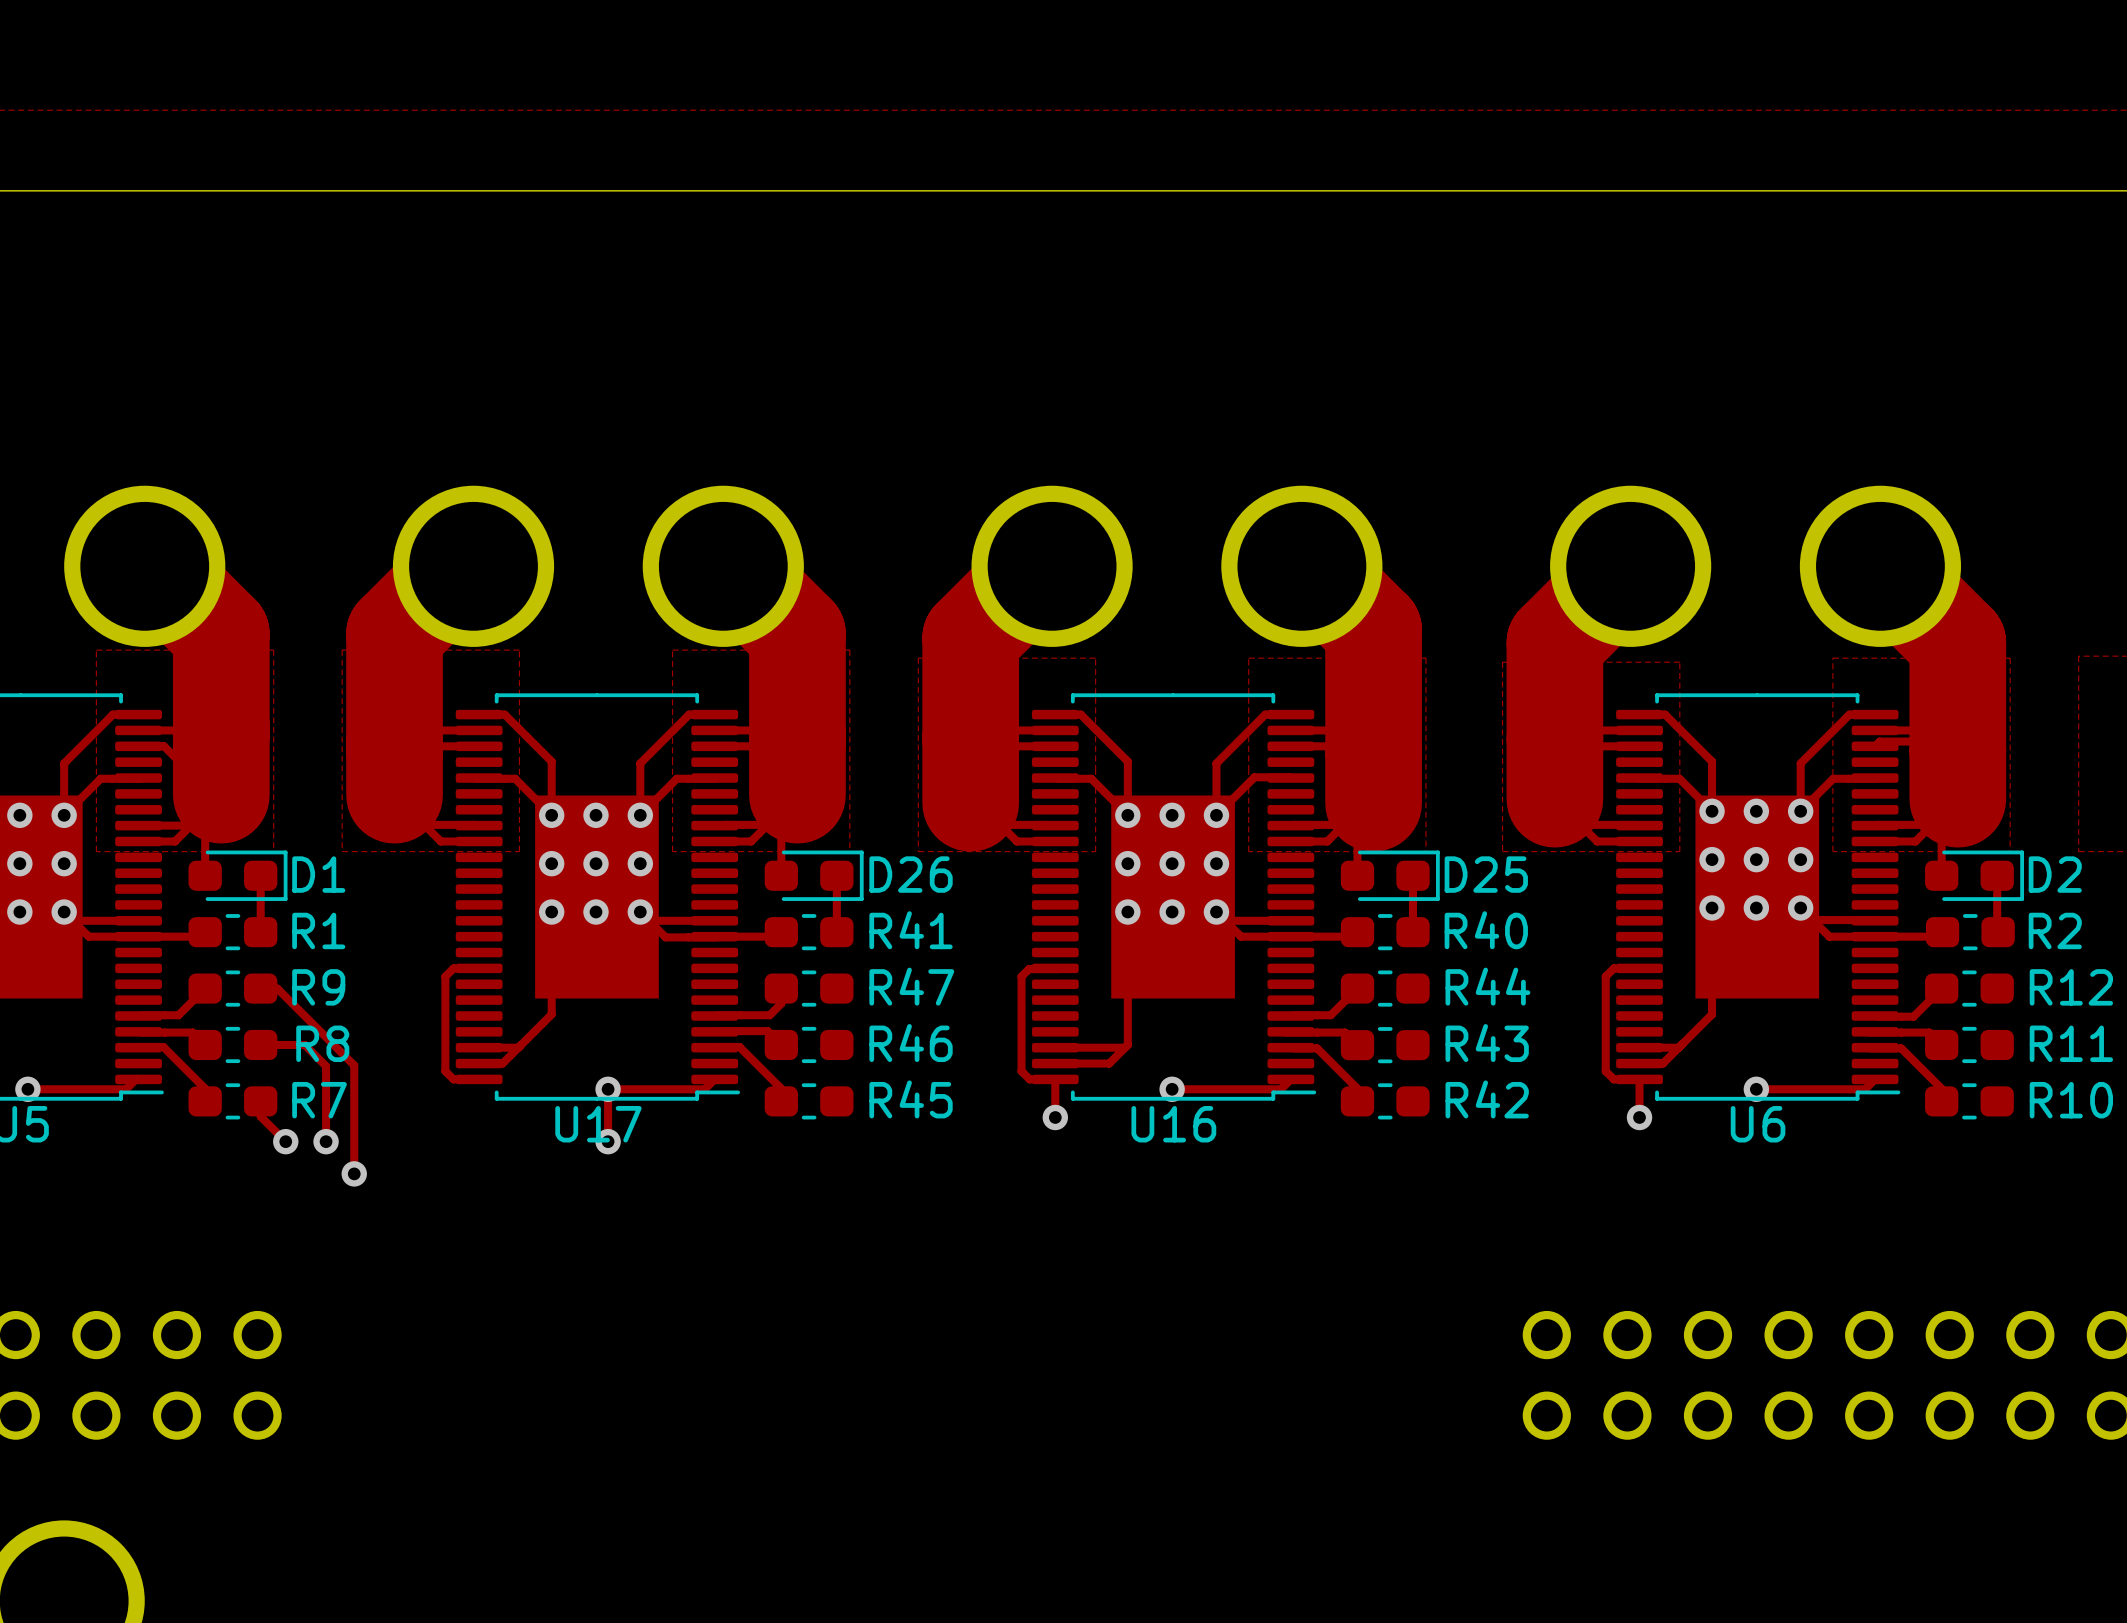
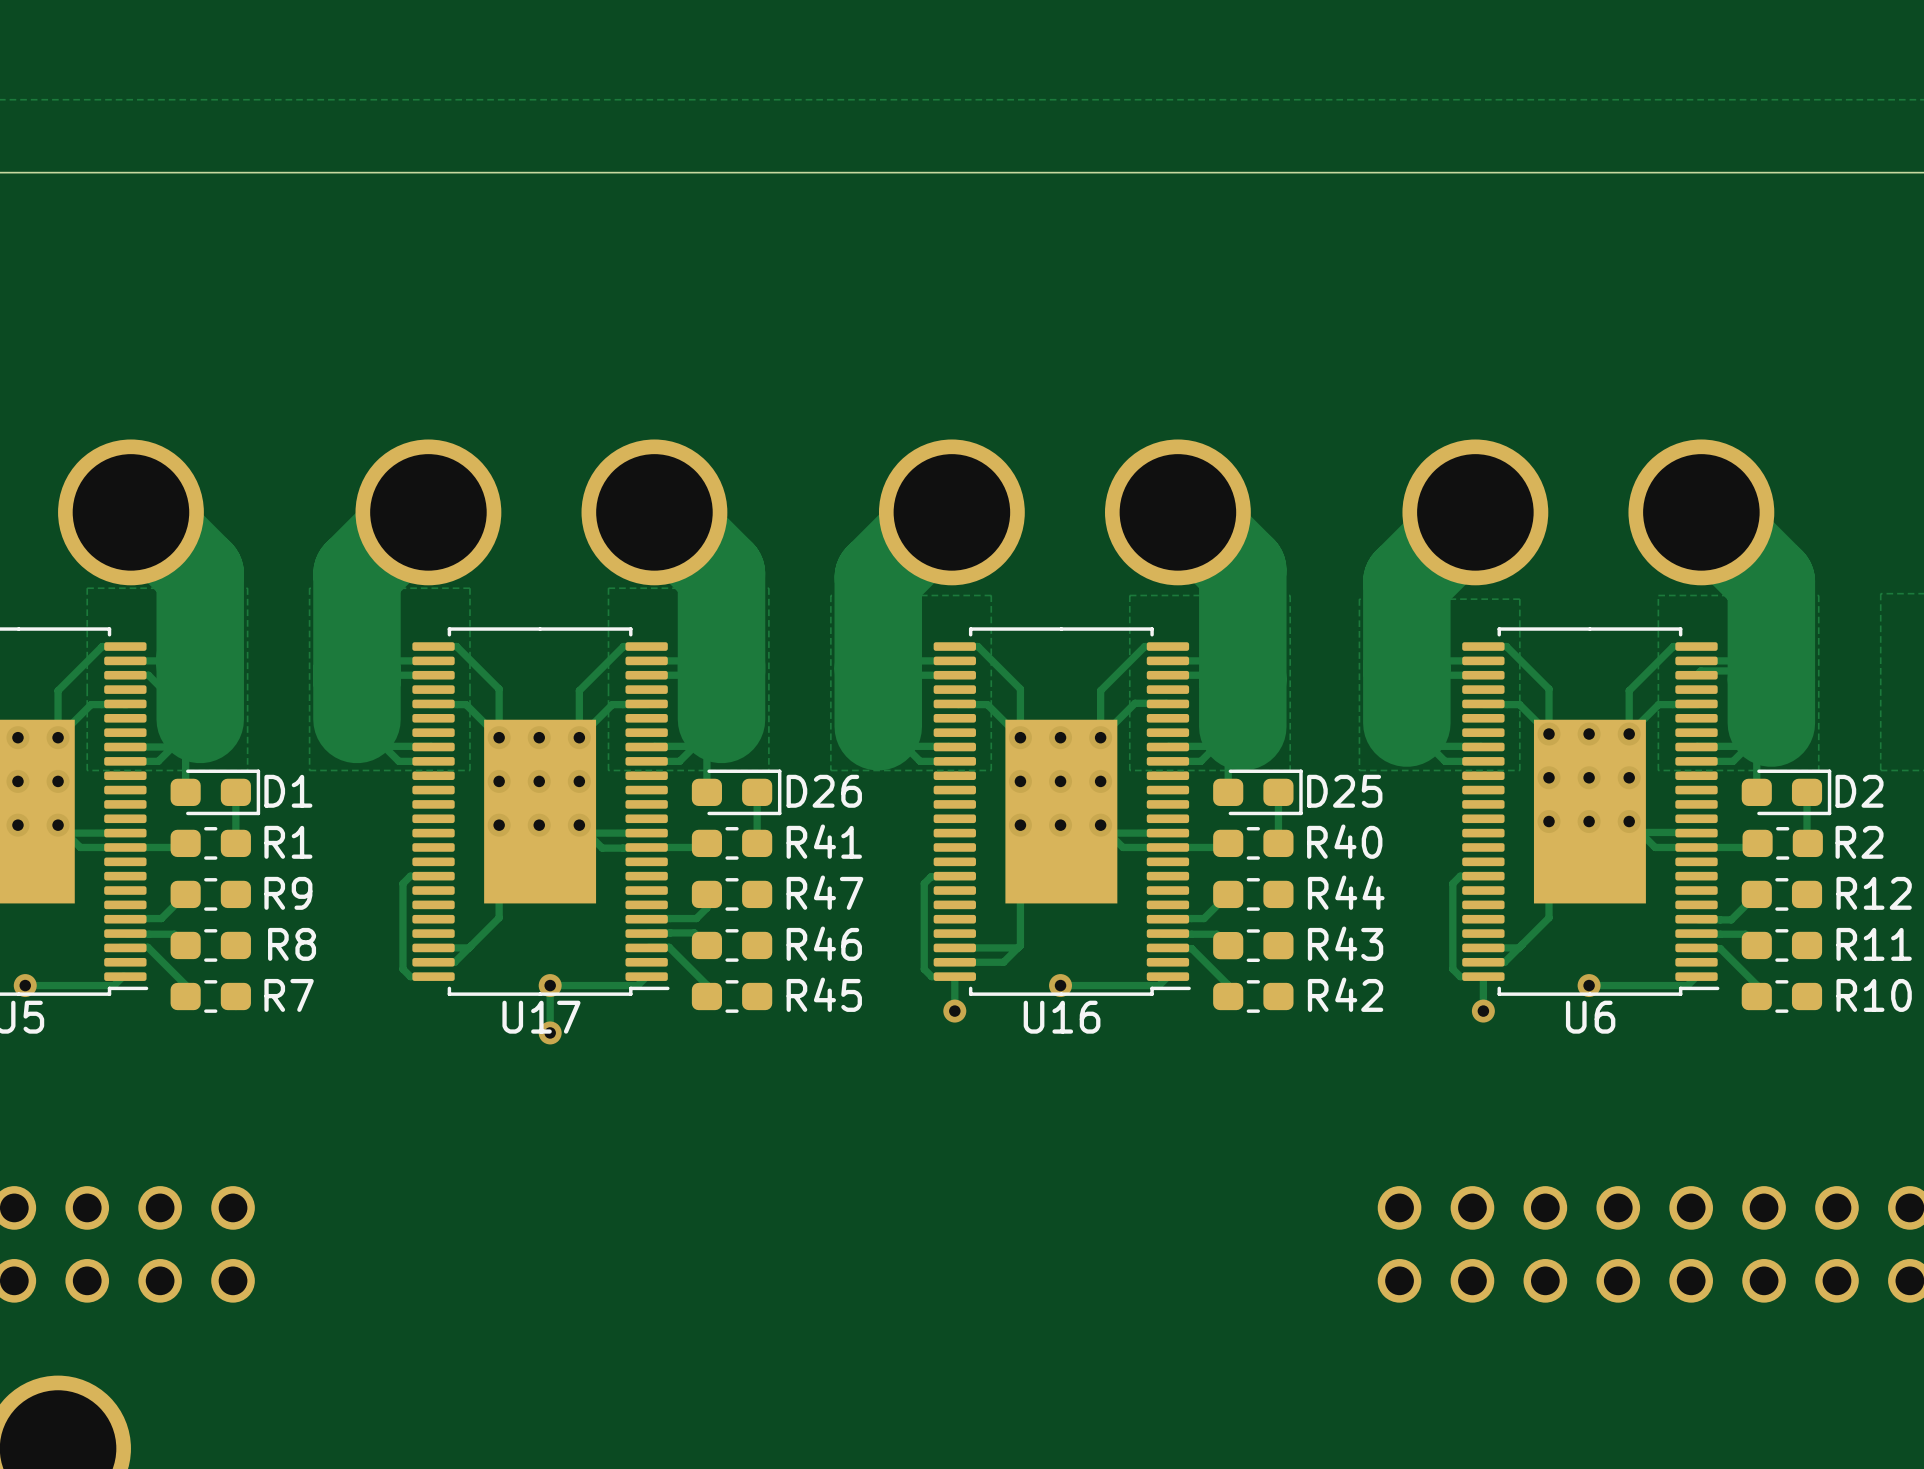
track: (260, 988) (277, 988) (354, 1065) (354, 1173) -> none
track: (260, 1044) (304, 1044) (326, 1066) (326, 1141) -> none
track: (260, 1112) (260, 1116) (285, 1141) -> none
via: (285, 1141) -> none
via: (326, 1141) -> none
via: (354, 1173) -> none

